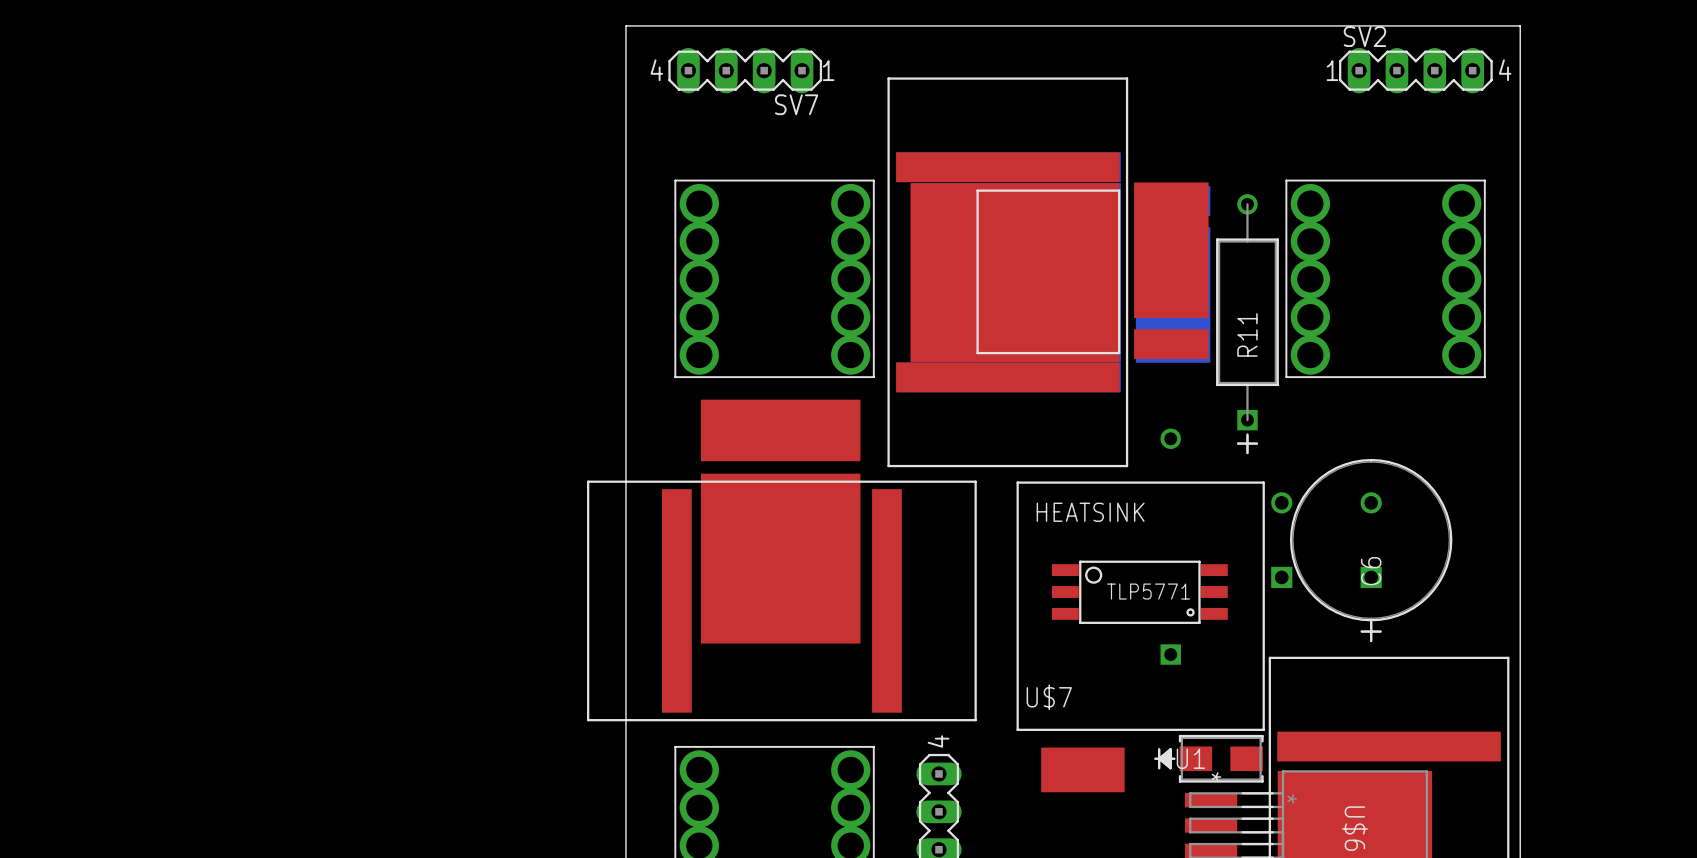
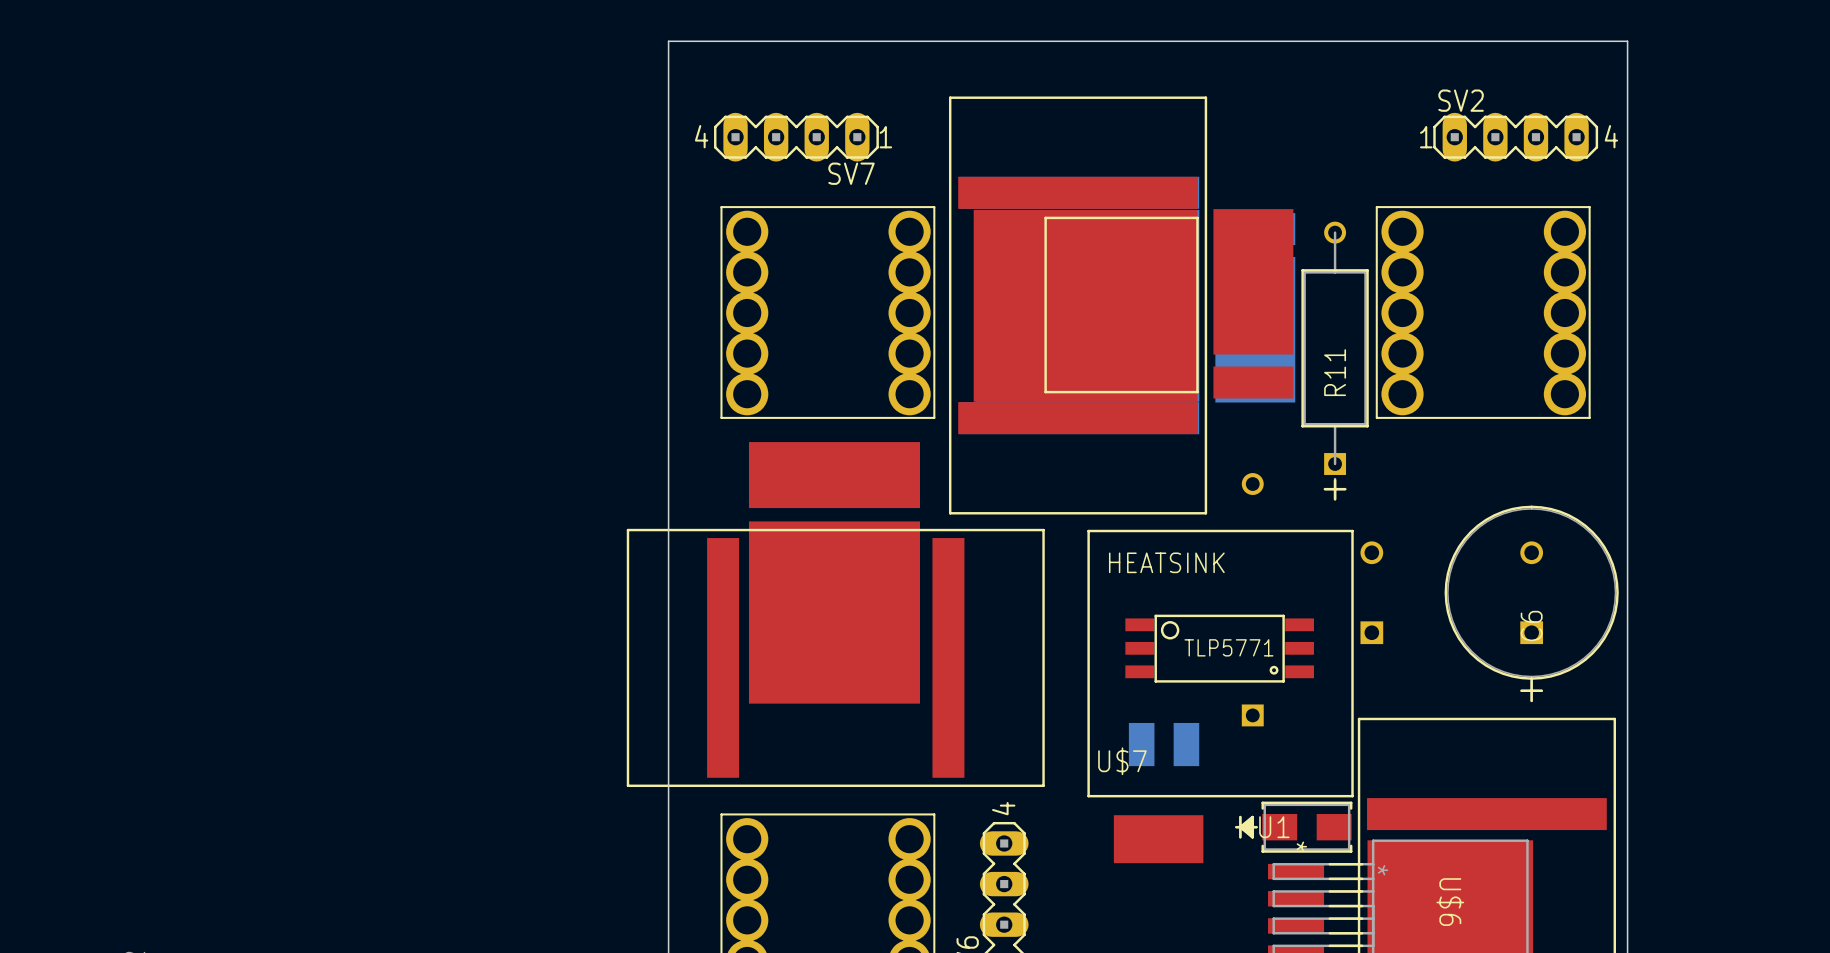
SV7 position: (745, 70) -> (796, 137)
SV2 position: (1415, 70) -> (1515, 137)
C6 position: (1371, 550) -> (1531, 603)
part: none -> (1164, 744)

